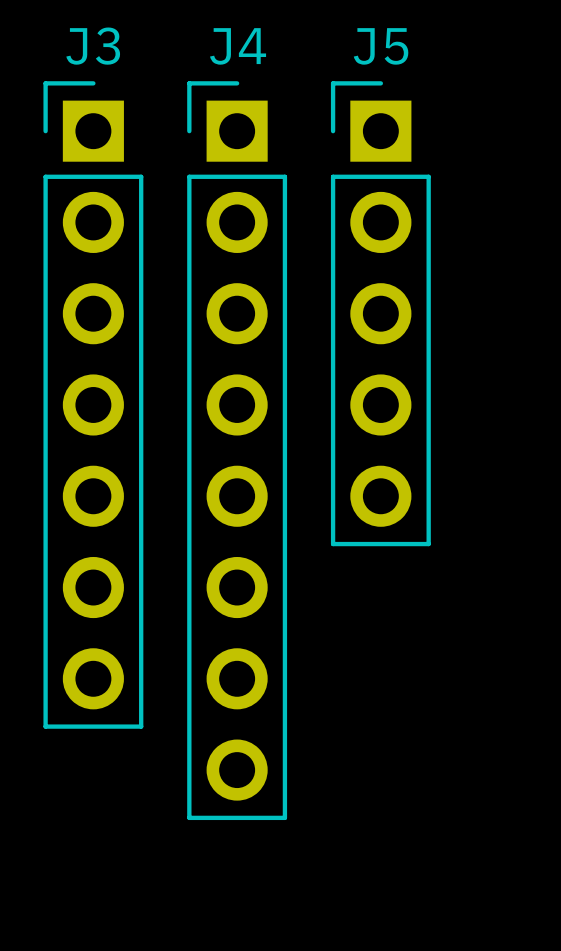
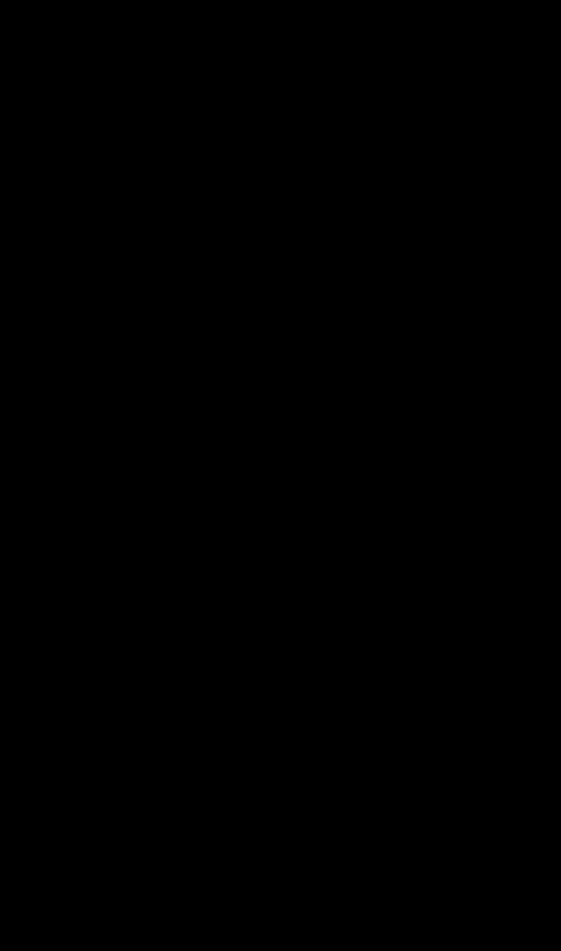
J5: (380, 313) -> none
J3: (93, 404) -> none
J4: (237, 450) -> none

